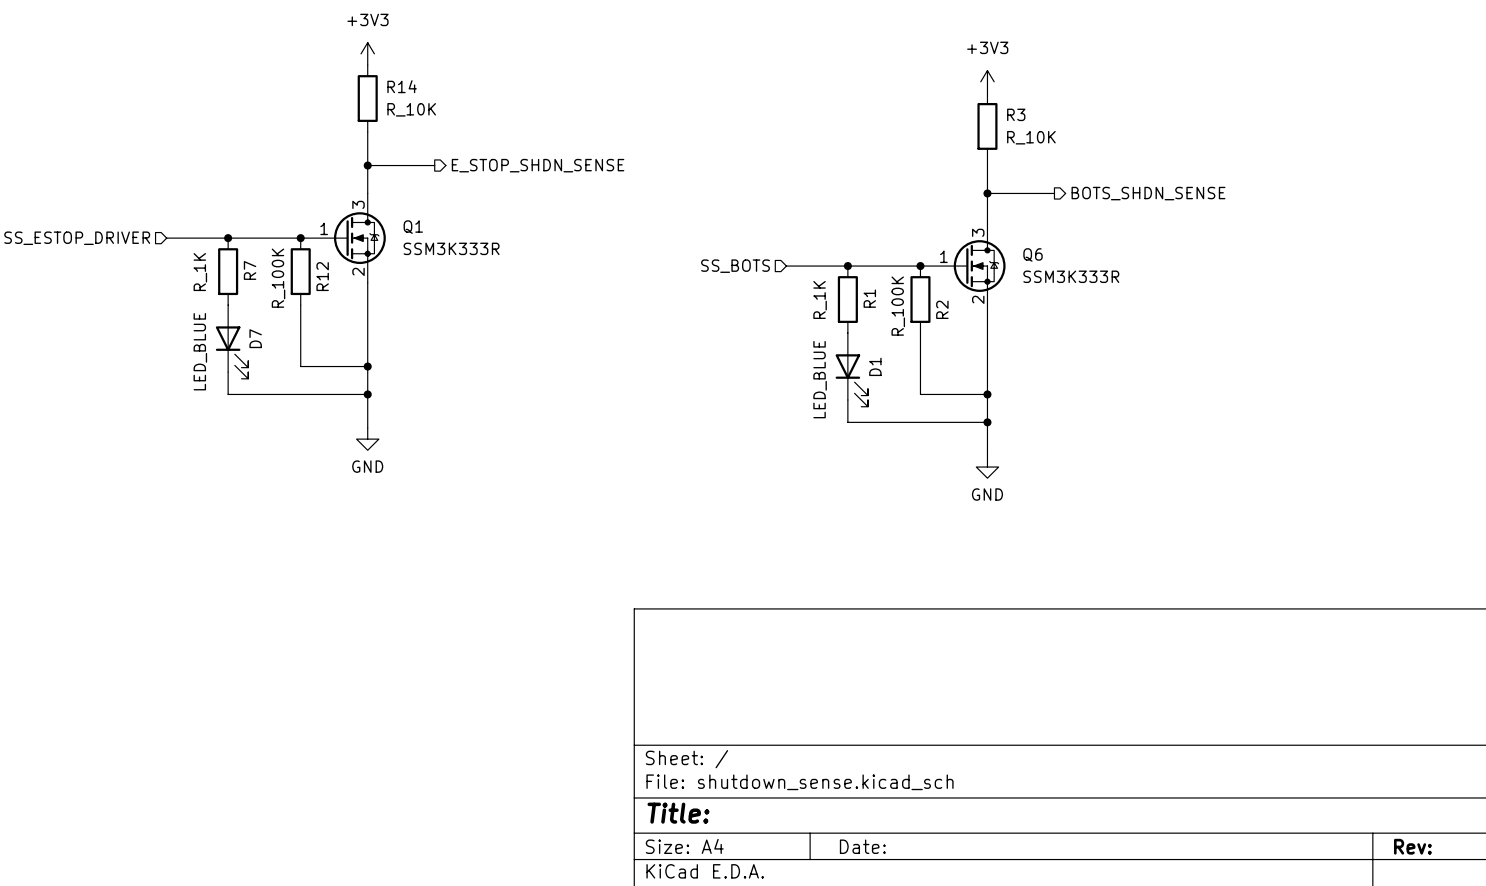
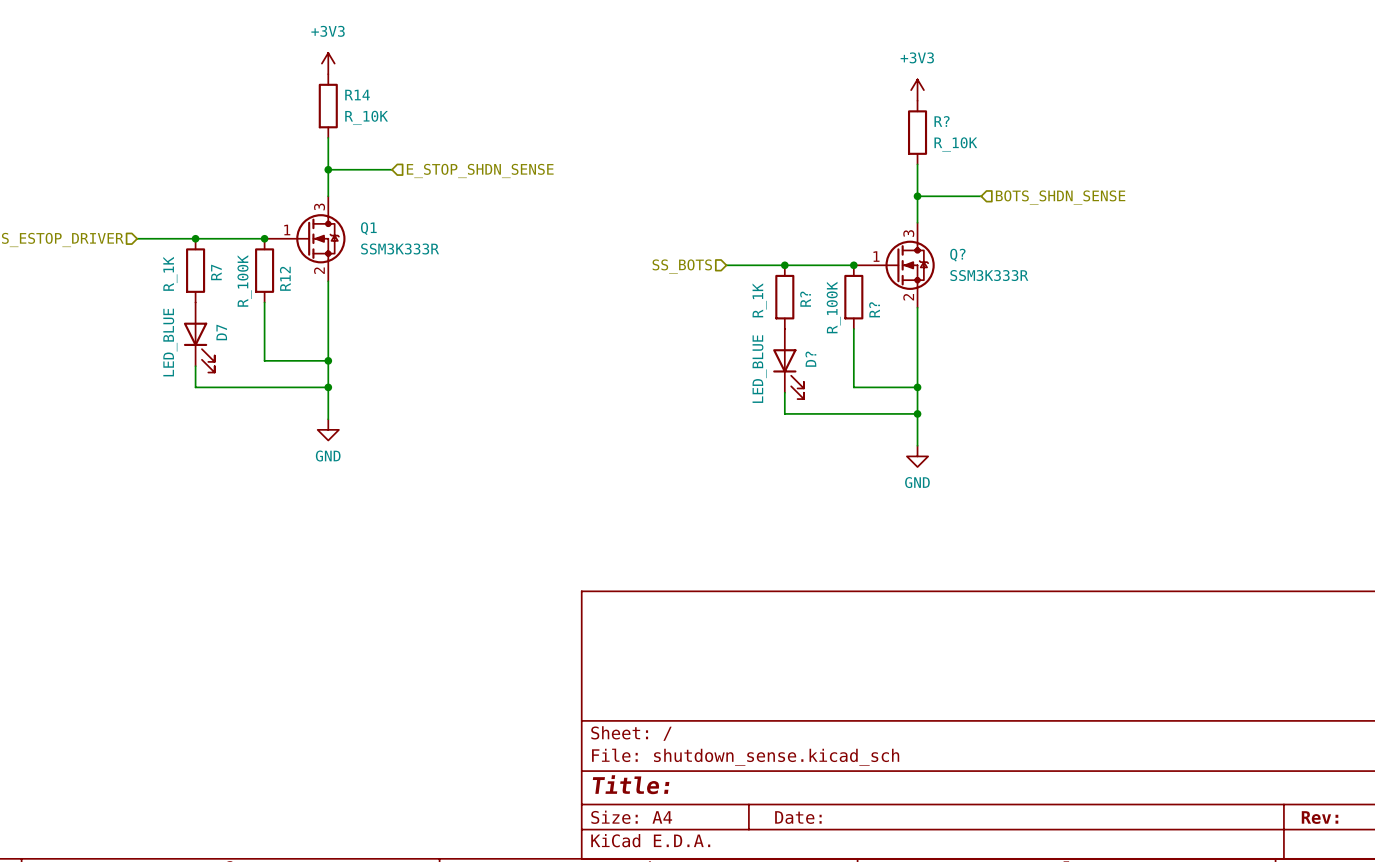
R3 name: R3 (1016, 114) -> R? (942, 121)
hierarchical label shape: output (538, 165) -> input (480, 170)
hierarchical label shape: output (1148, 193) -> input (1060, 197)
Q6 name: Q6 (1033, 254) -> Q? (957, 255)
R1 name: R1 (869, 298) -> R? (805, 299)
R2 name: R2 (942, 309) -> R? (874, 309)
D1 name: D1 (875, 366) -> D? (810, 359)

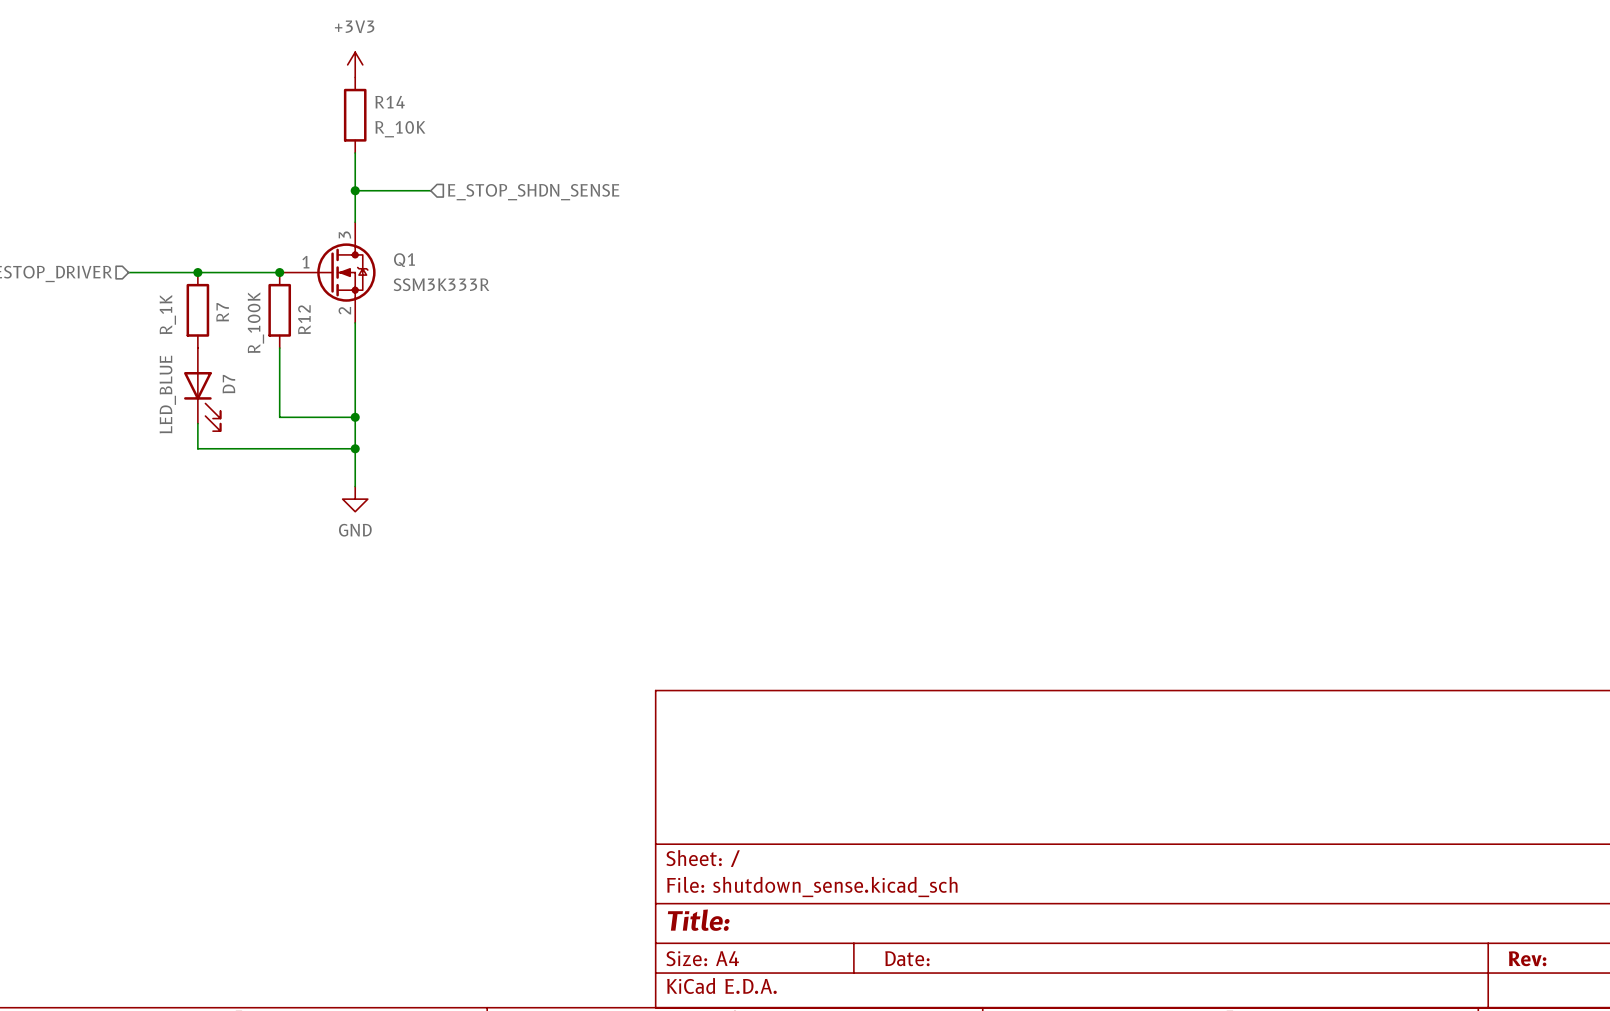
power symbol: +3V3 (917, 90) -> none
R?: R_10K (917, 132) -> none
wire: (917, 164) (917, 222) -> none
wire: (917, 196) (981, 196) -> none
junction: (917, 196) -> none
hierarchical label: BOTS_SHDN_SENSE (1060, 197) -> none
wire: (726, 265) (853, 265) -> none
junction: (784, 265) -> none
junction: (853, 265) -> none
Q?: SSM3K333R (894, 265) -> none
hierarchical label: SS_BOTS (682, 266) -> none
R?: R_1K (784, 297) -> none
R?: R_100K (853, 297) -> none
wire: (917, 307) (917, 445) -> none
wire: (853, 329) (853, 387) (917, 387) -> none
D?: LED_BLUE (788, 364) -> none
junction: (917, 387) -> none
wire: (784, 392) (784, 413) (917, 413) -> none
junction: (917, 413) -> none
power symbol: GND (917, 456) -> none

